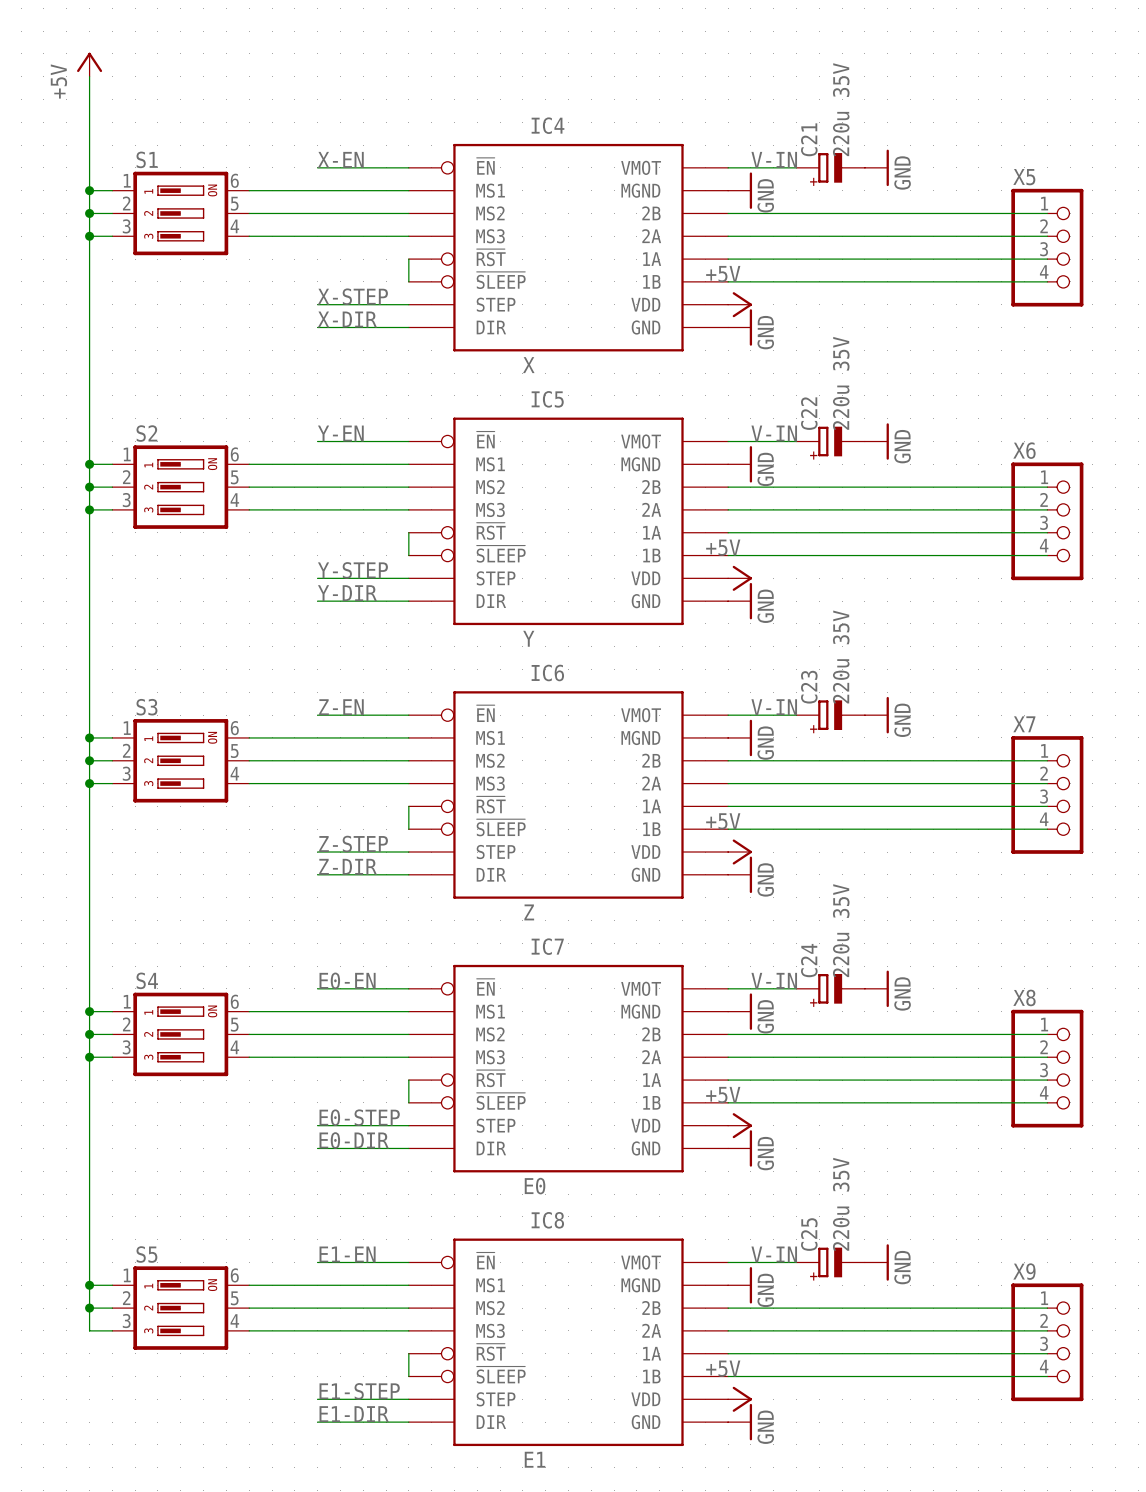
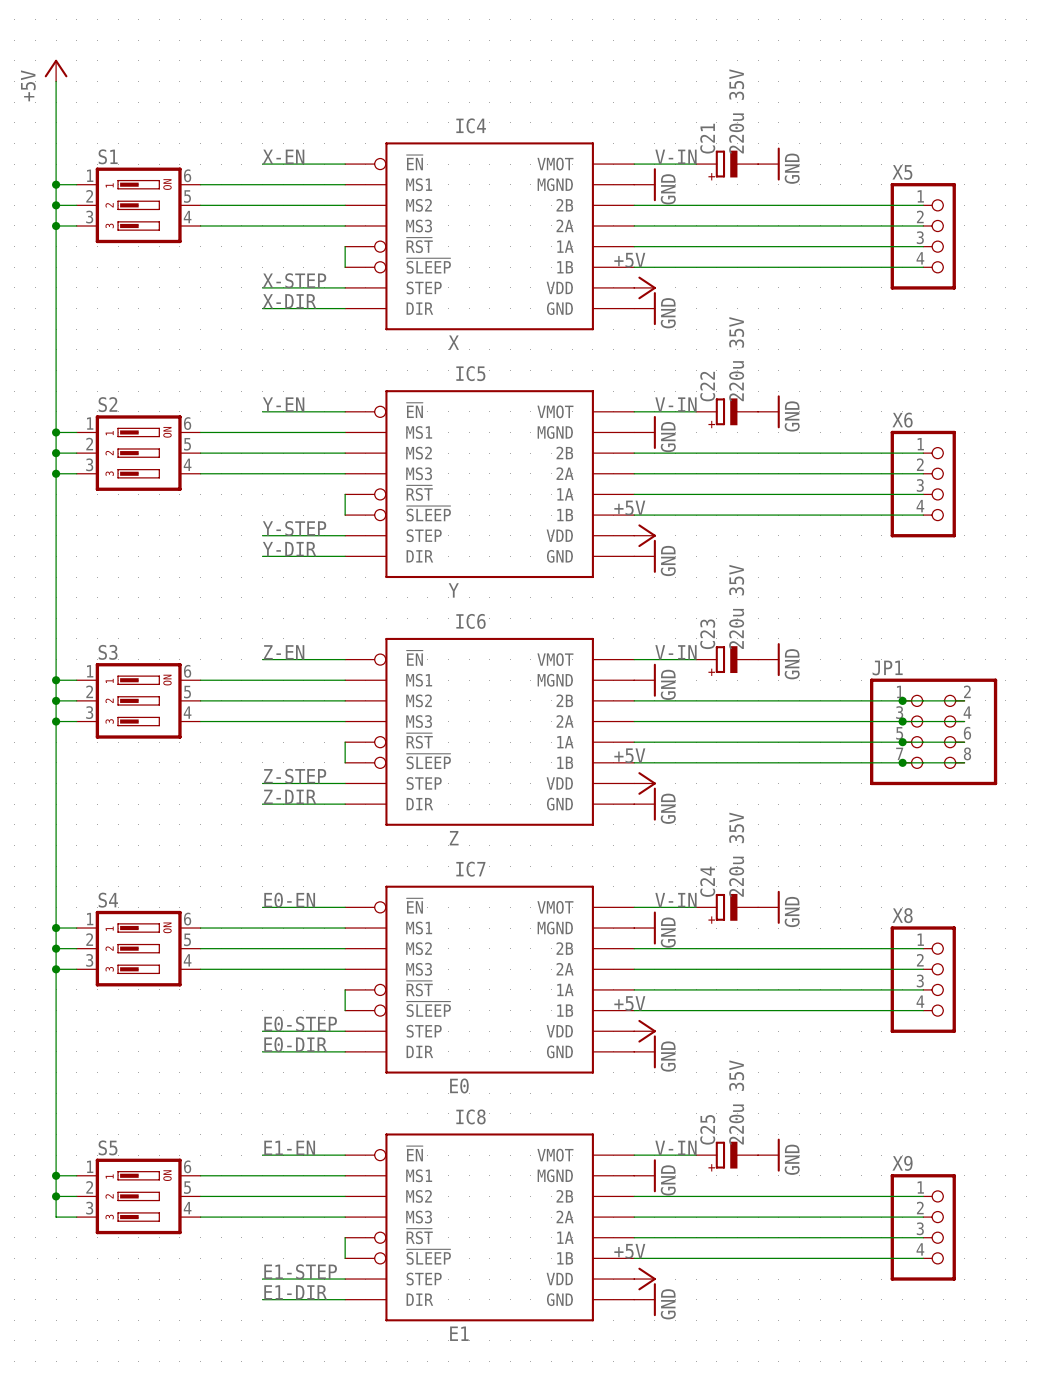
junction: none -> (902, 700)
wire: none -> (923, 700) (964, 700)
junction: none -> (902, 721)
wire: none -> (923, 721) (964, 721)
X7: (1047, 794) -> none
JP1: none -> (933, 731)
junction: none -> (902, 742)
wire: none -> (923, 742) (964, 742)
junction: none -> (902, 762)
wire: none -> (923, 762) (964, 762)

